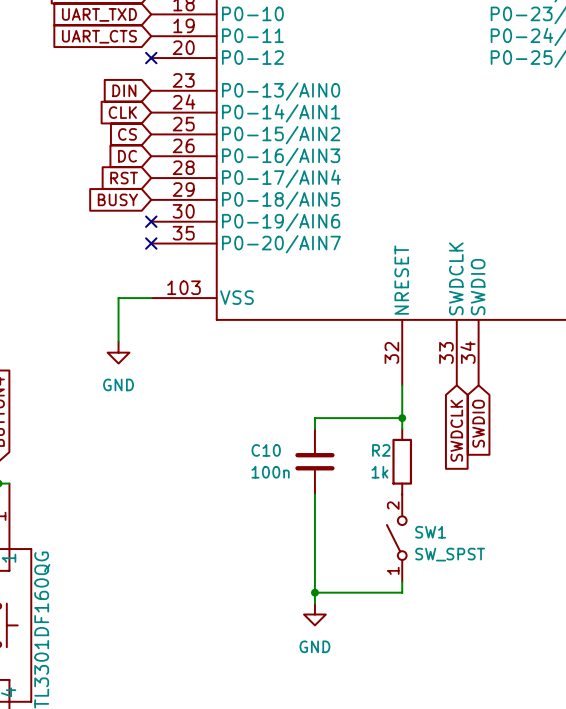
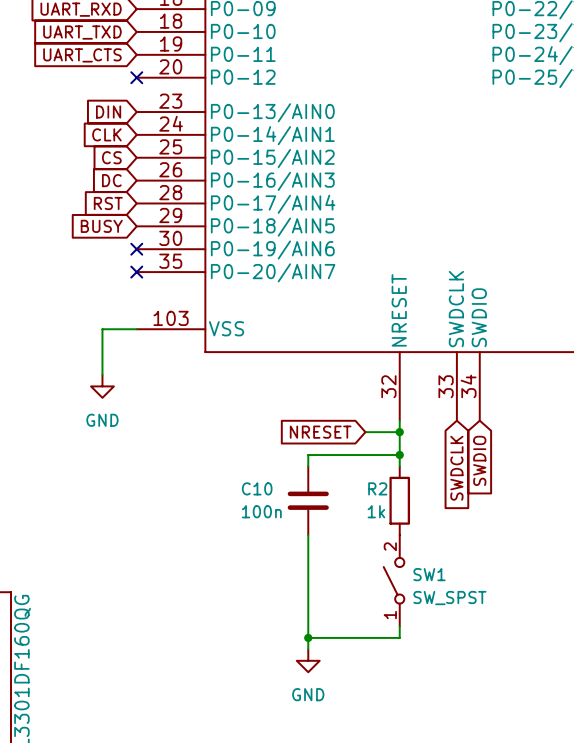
global label: none -> NRESET (320, 432)
wire: none -> (365, 432) (399, 432)
junction: none -> (399, 432)

